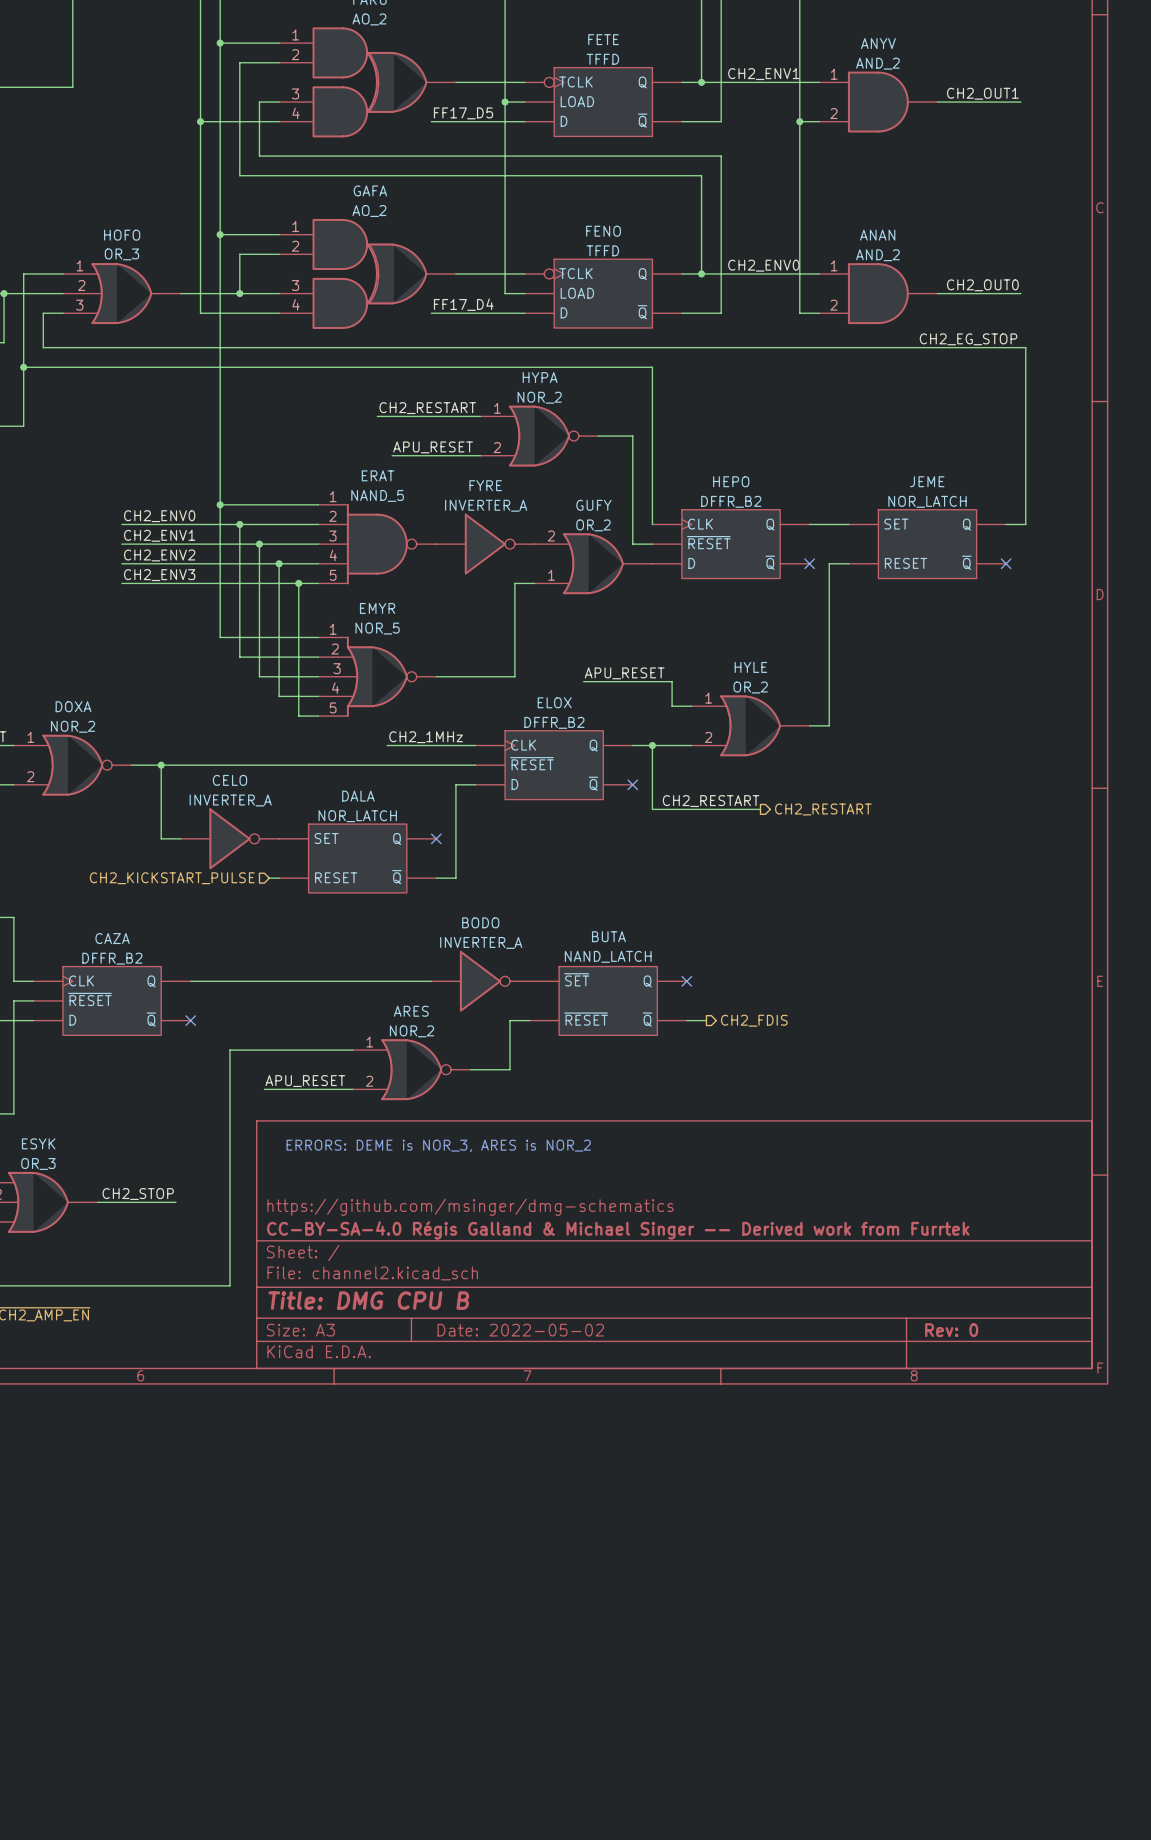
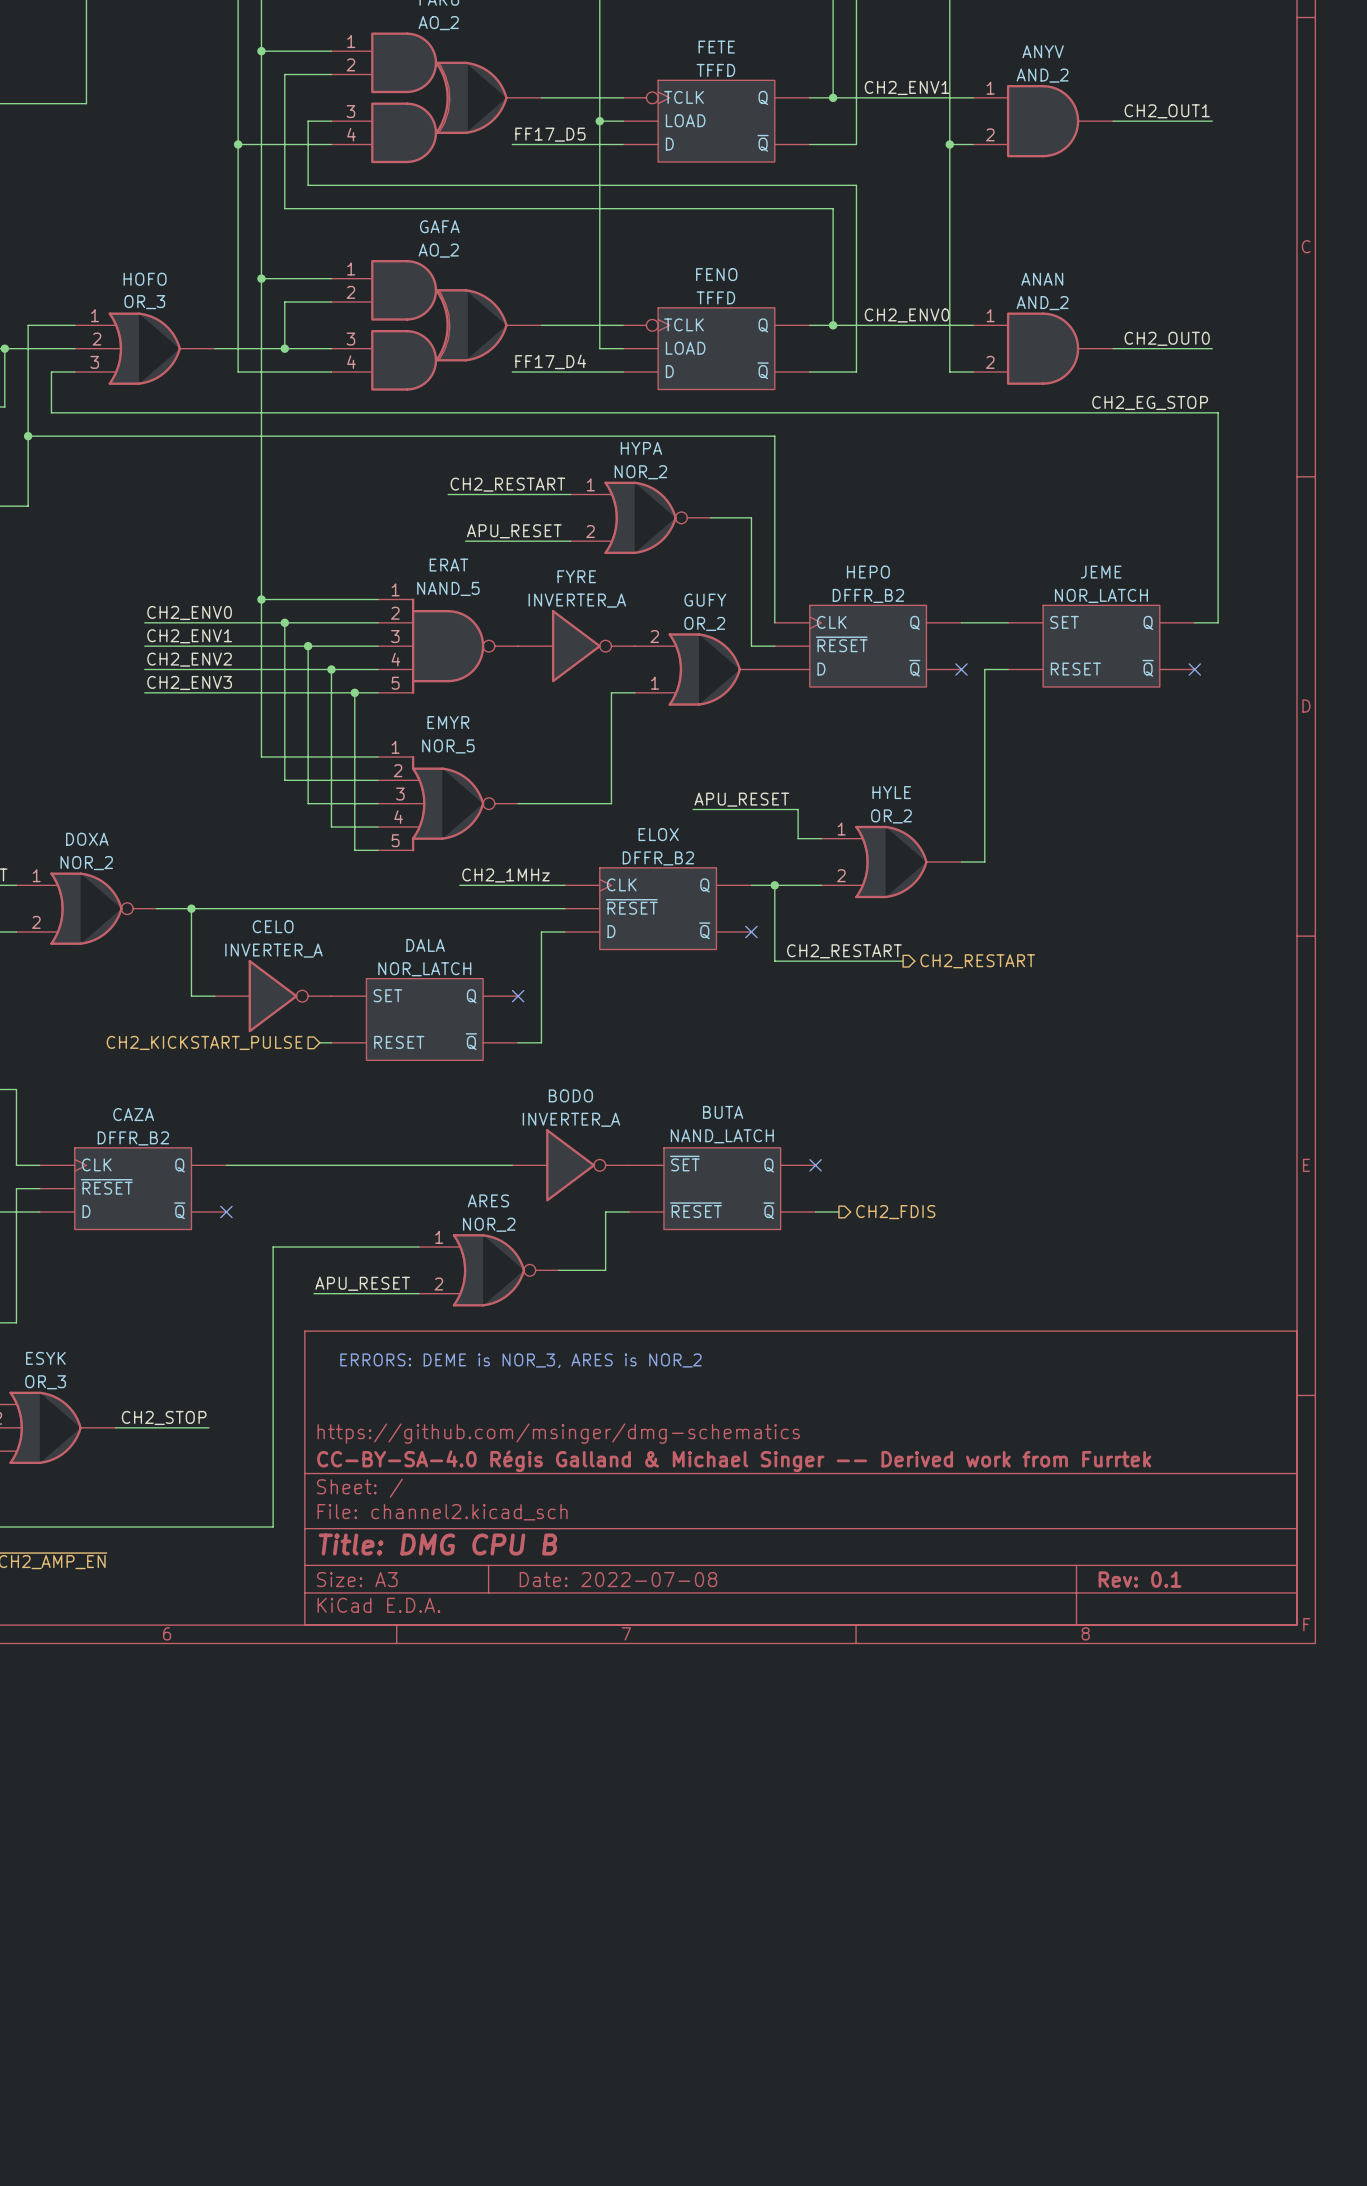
title block: Date: 2022-05-02 (520, 1330) -> Date: 2022-07-08 (618, 1579)
title block: Rev: 0 (951, 1330) -> Rev: 0.1 (1140, 1579)

